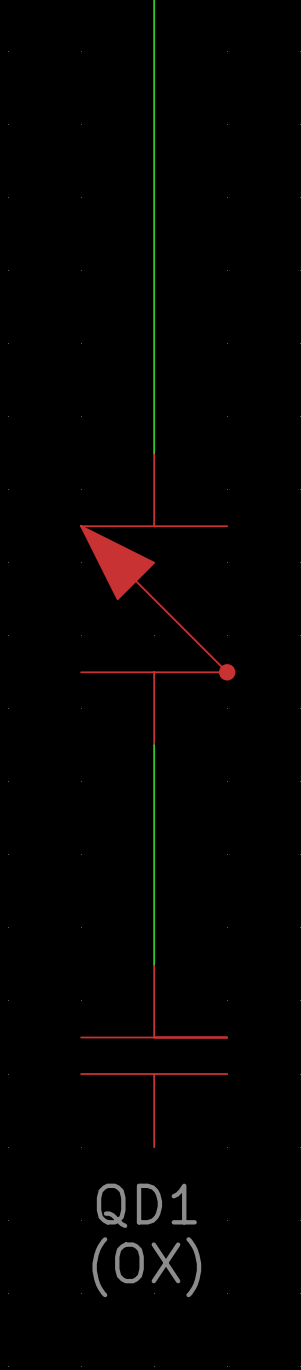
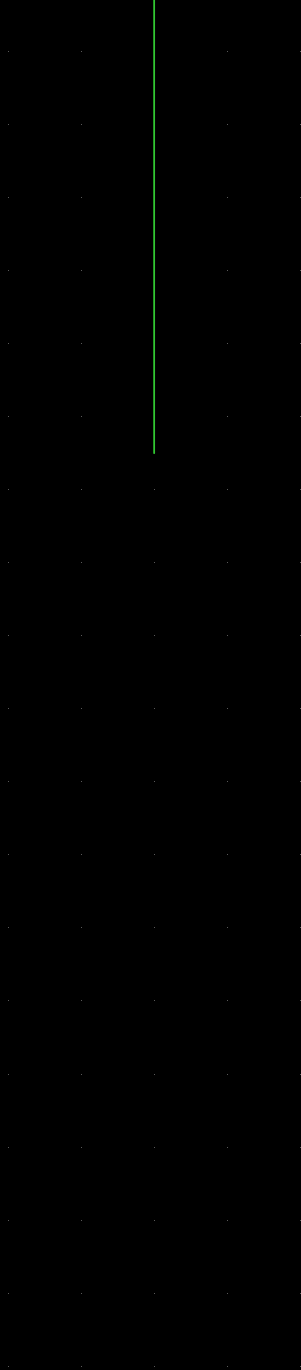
part: (157, 599) -> none
wire: (154, 745) (154, 964) -> none
part: (154, 1055) -> none
text: QD1 (146, 1205) -> none
text: (OX) (146, 1267) -> none

